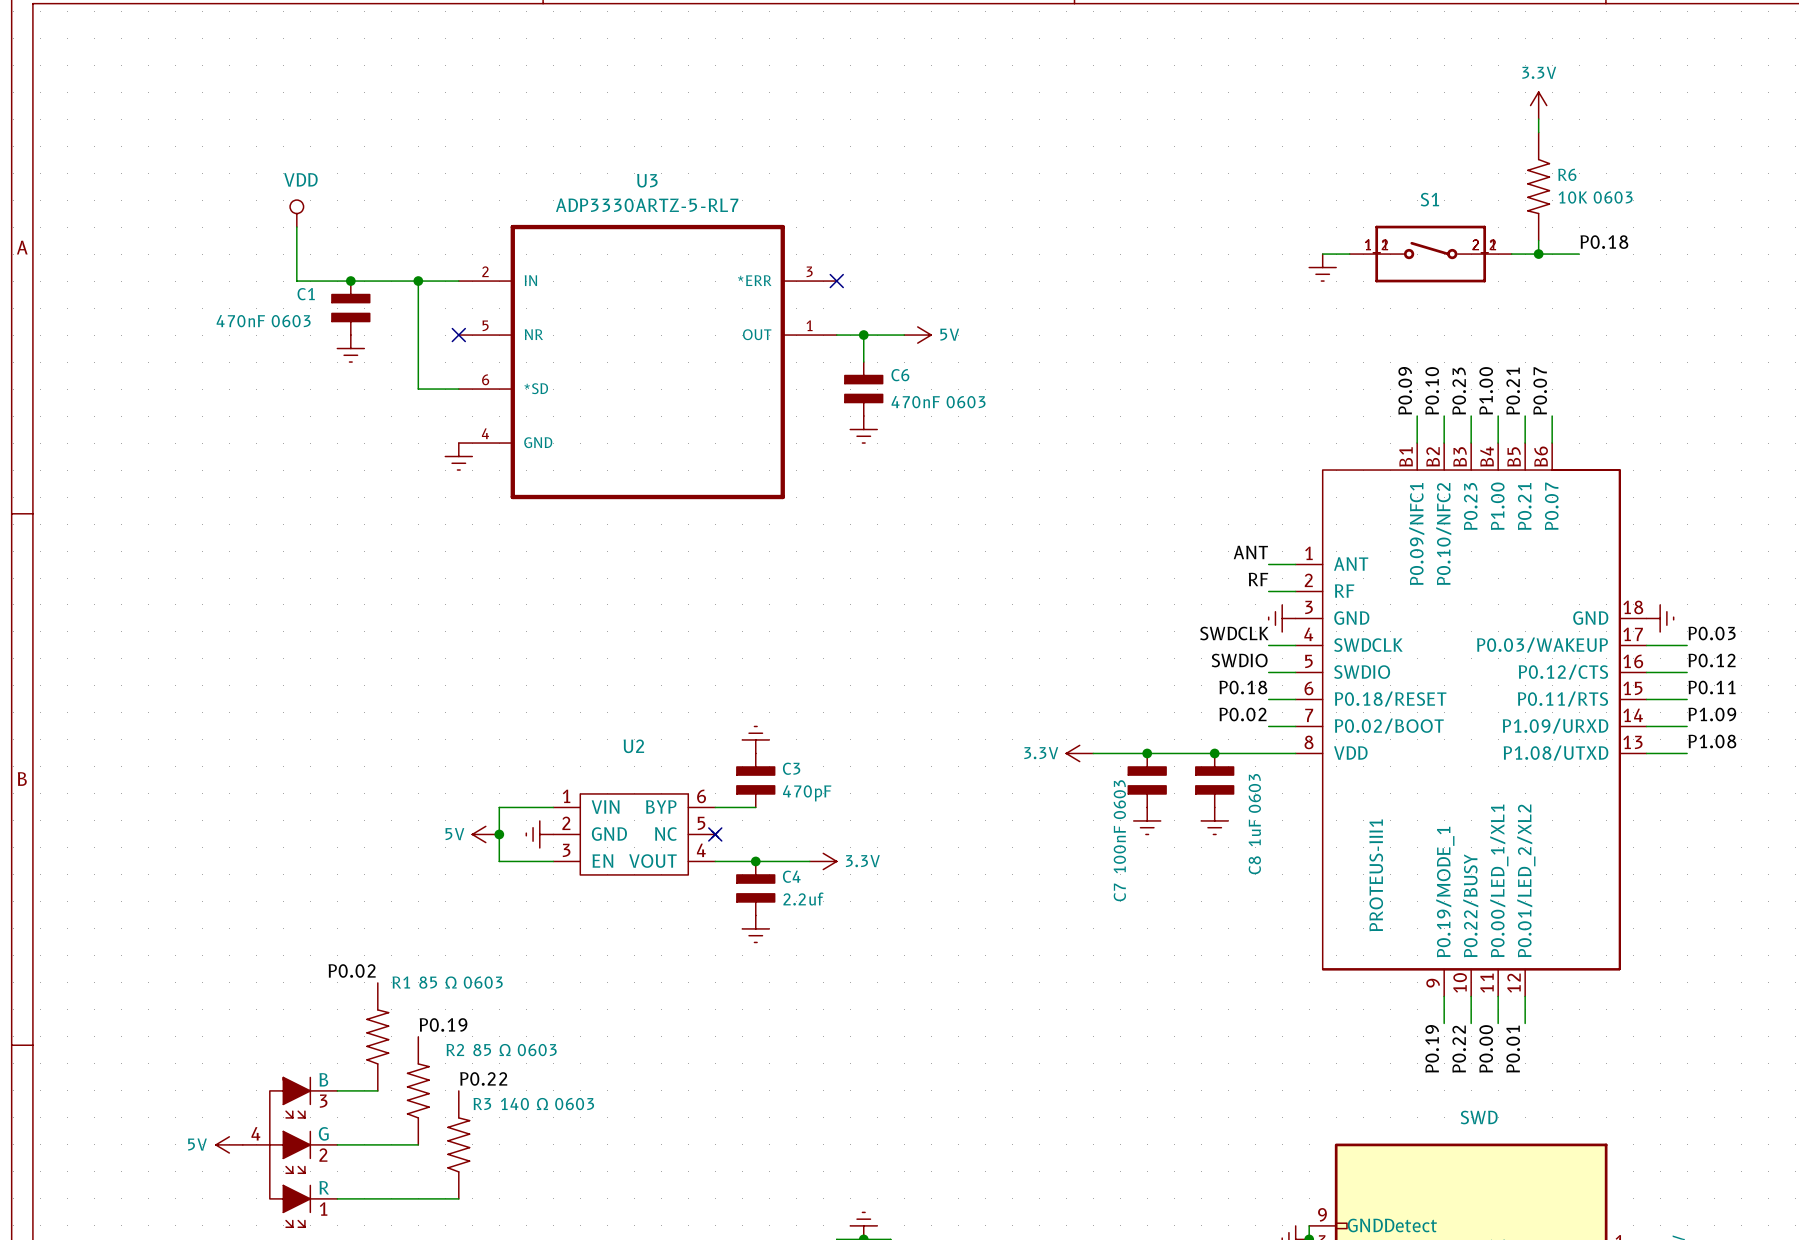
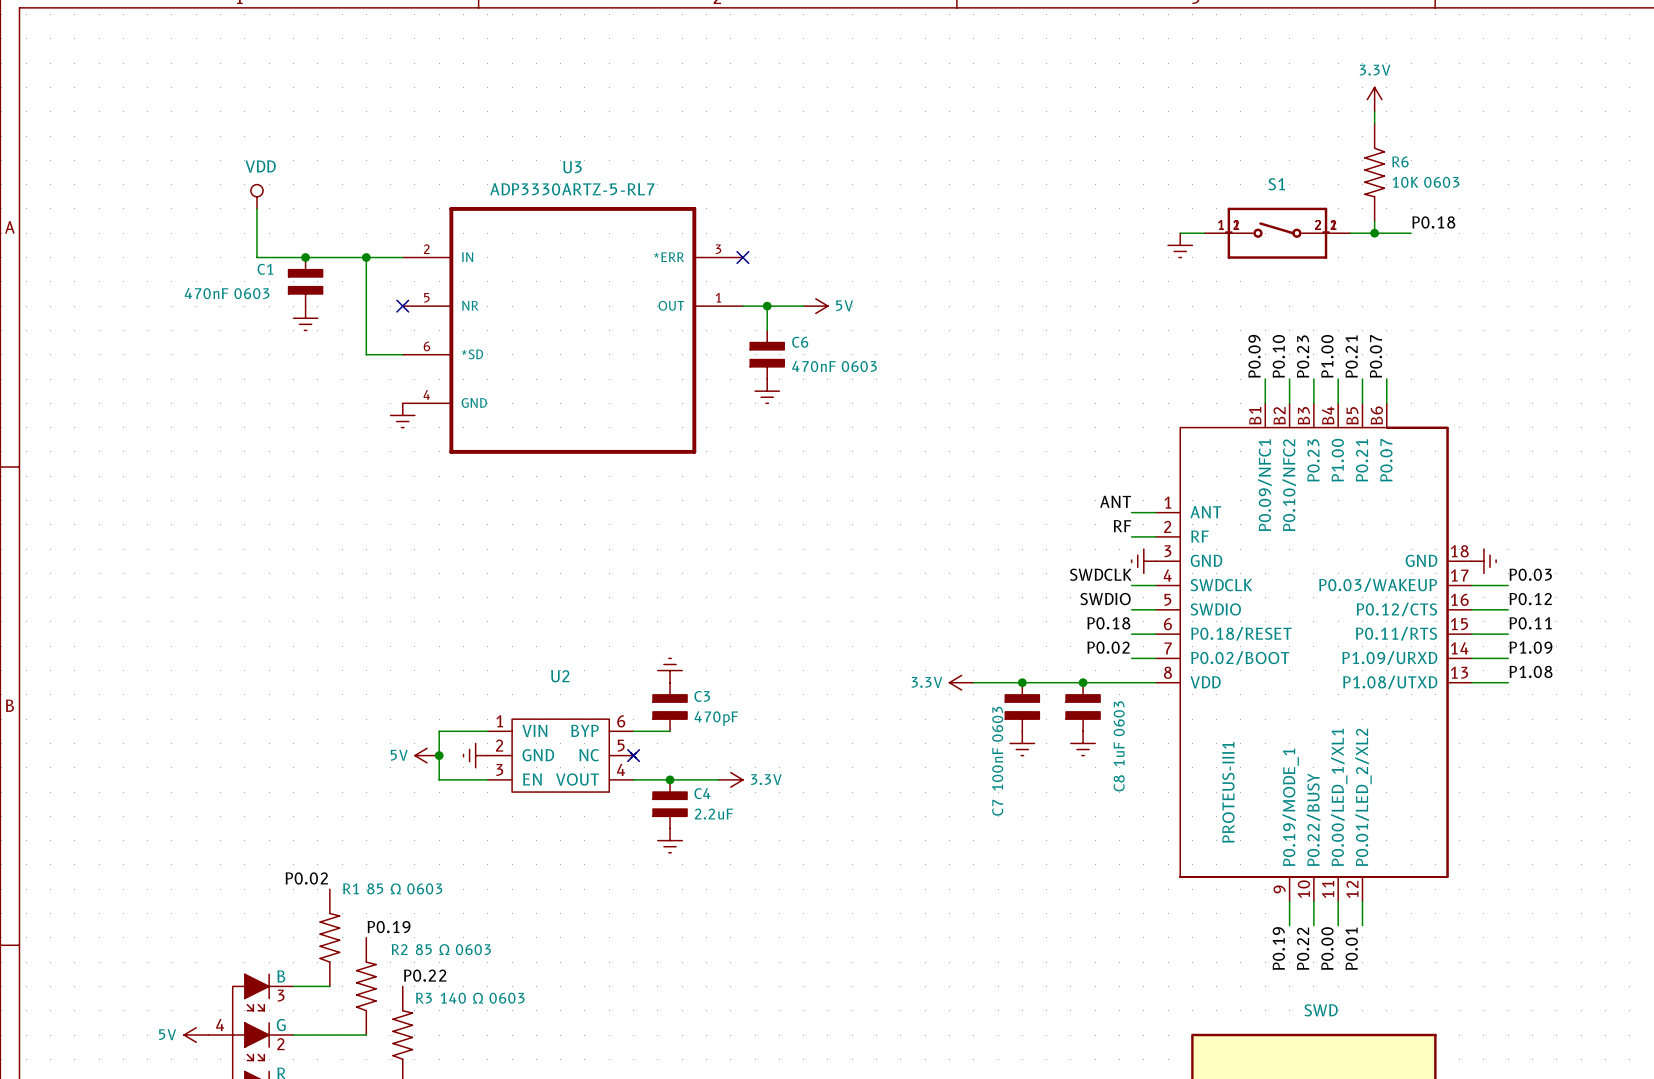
C4 value: 2.2uf (803, 899) -> 2.2uF (713, 814)

